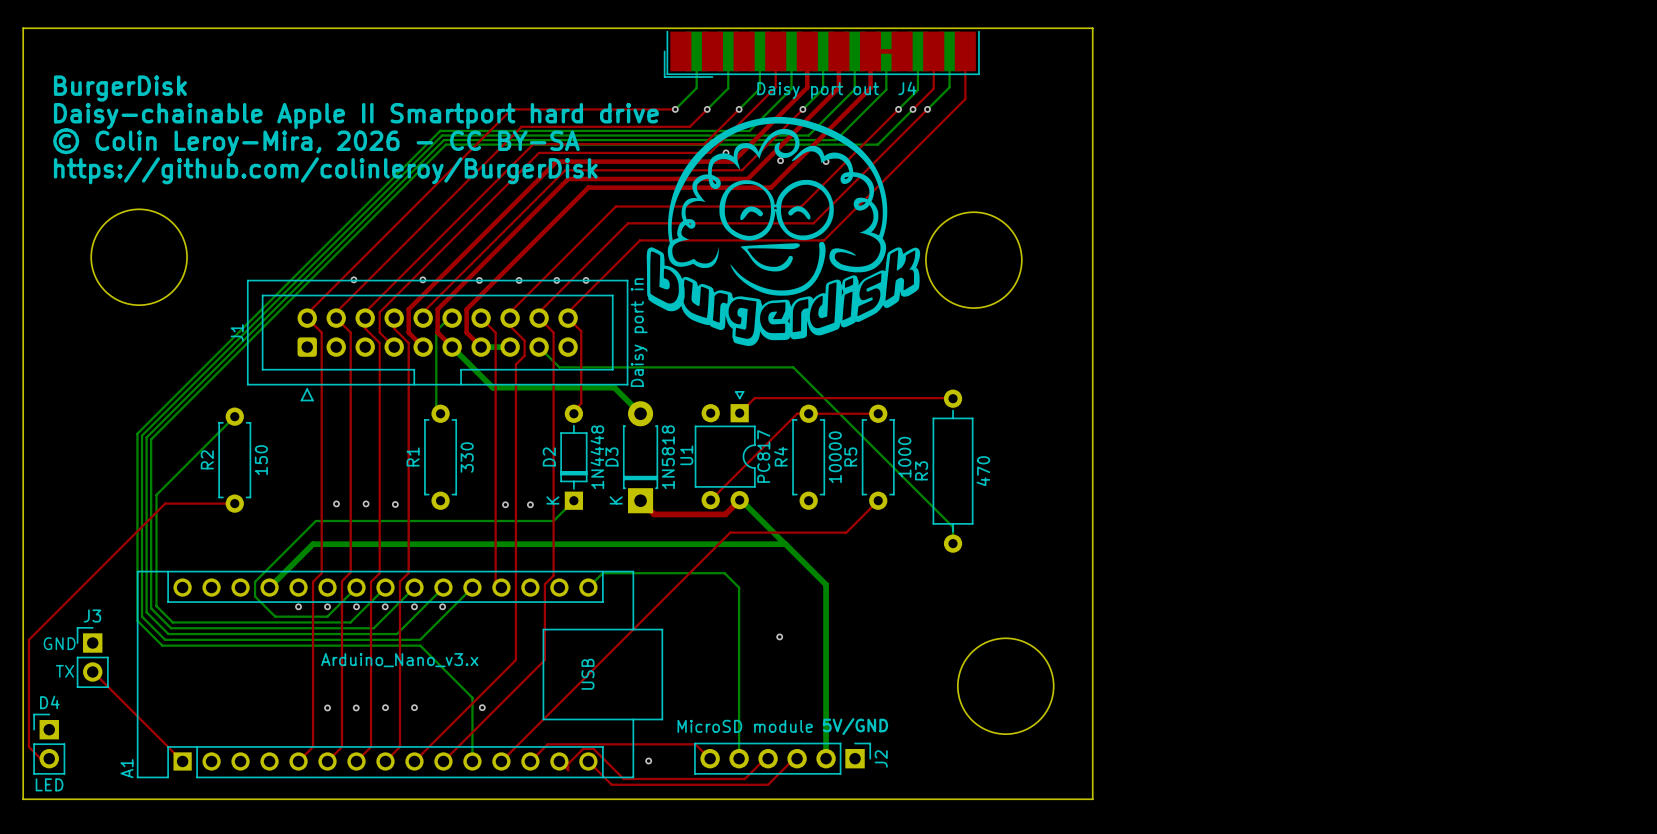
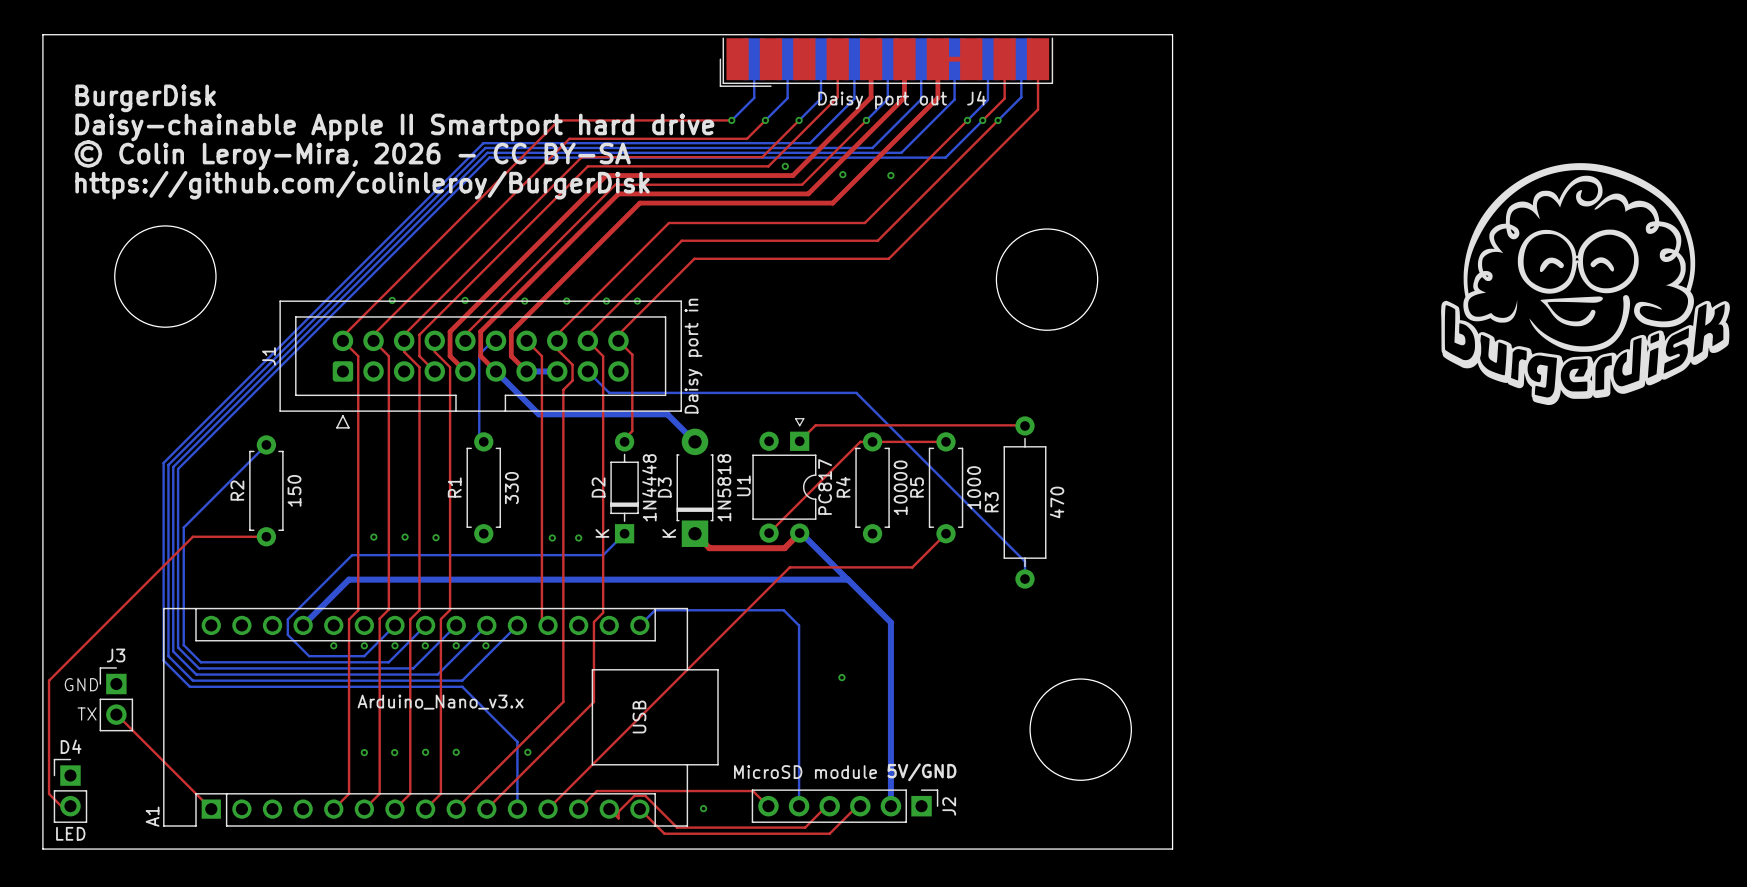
drawing: [646, 116, 921, 346] -> none
drawing: none -> [1441, 163, 1730, 406]

